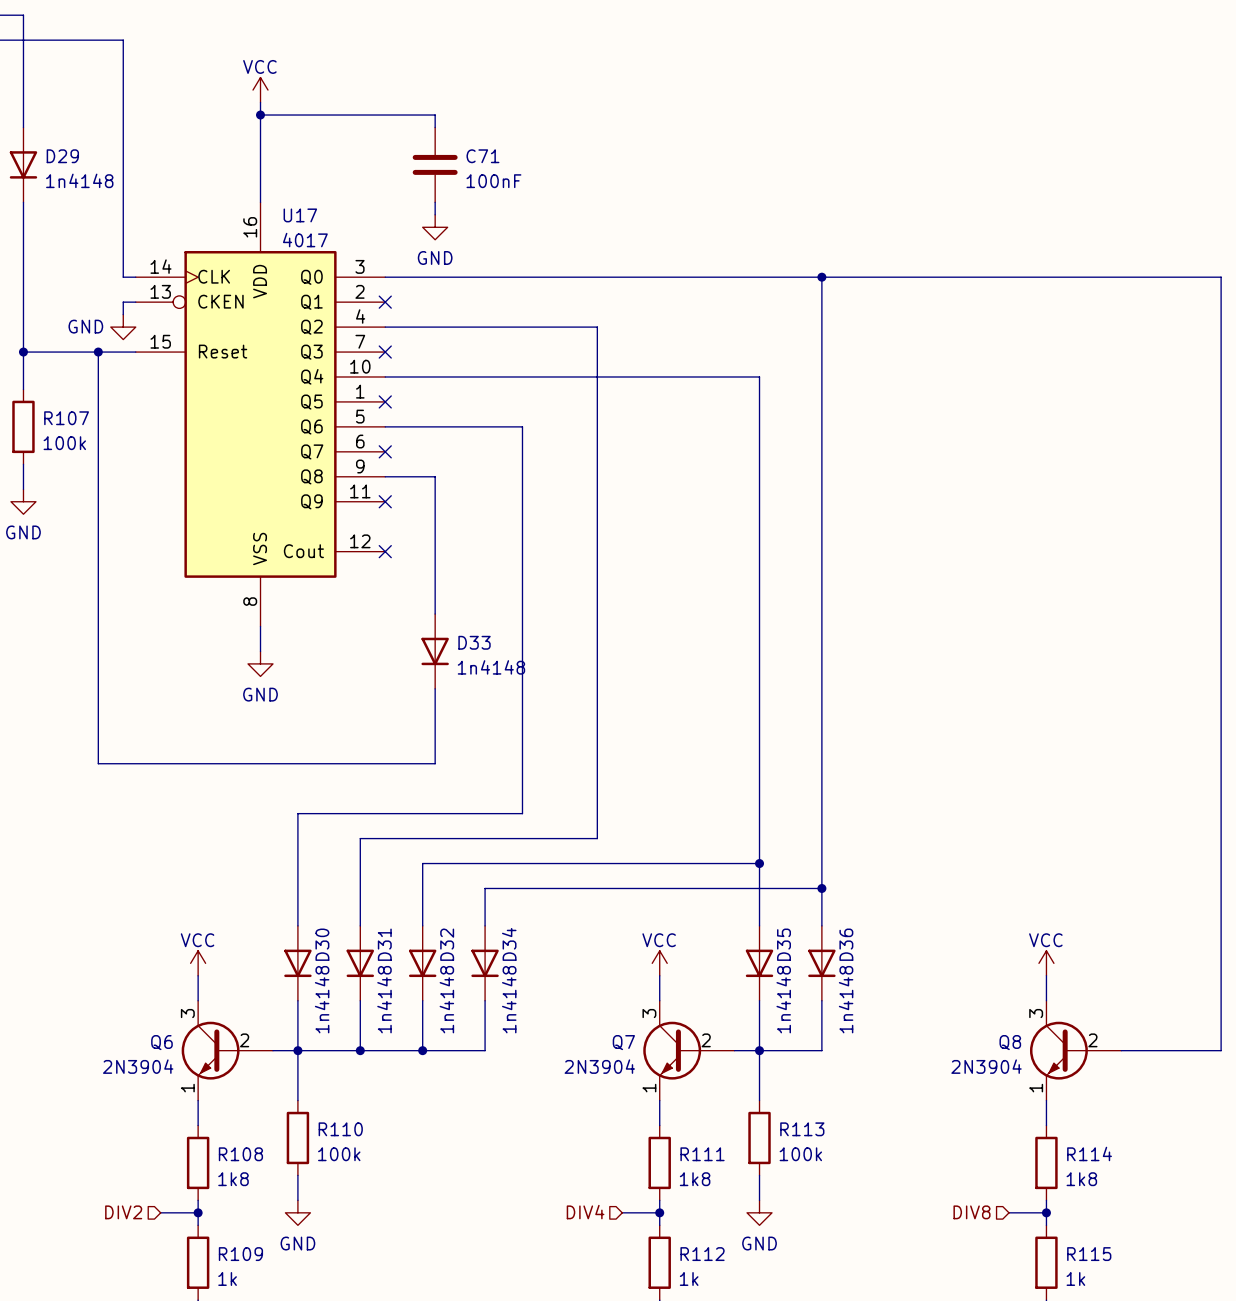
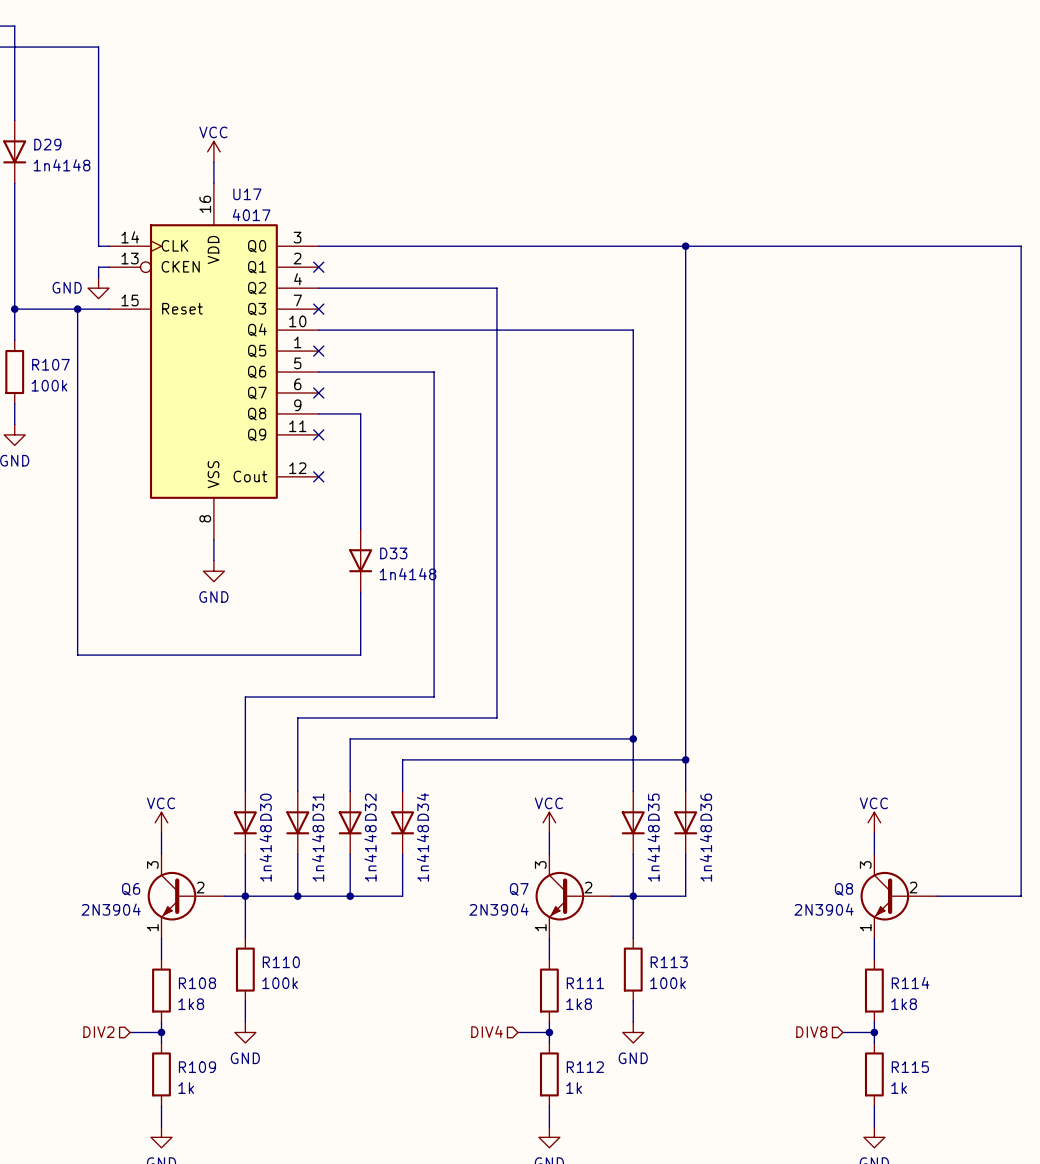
power symbol position: VCC (260, 90) -> VCC (213, 151)
wire: (260, 102) (260, 177) -> none
wire: (260, 115) (435, 115) (435, 127) -> none
junction: (260, 115) -> none
C71: 100nF (435, 164) -> none
wire: (435, 202) (435, 214) -> none
power symbol: GND (435, 227) -> none

